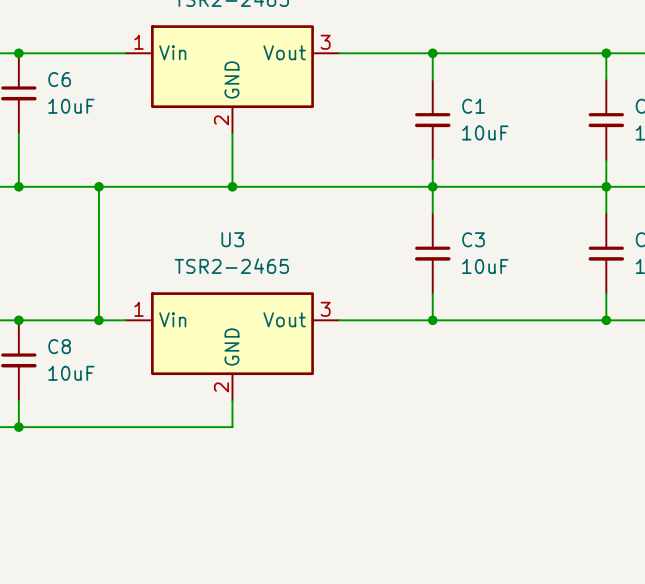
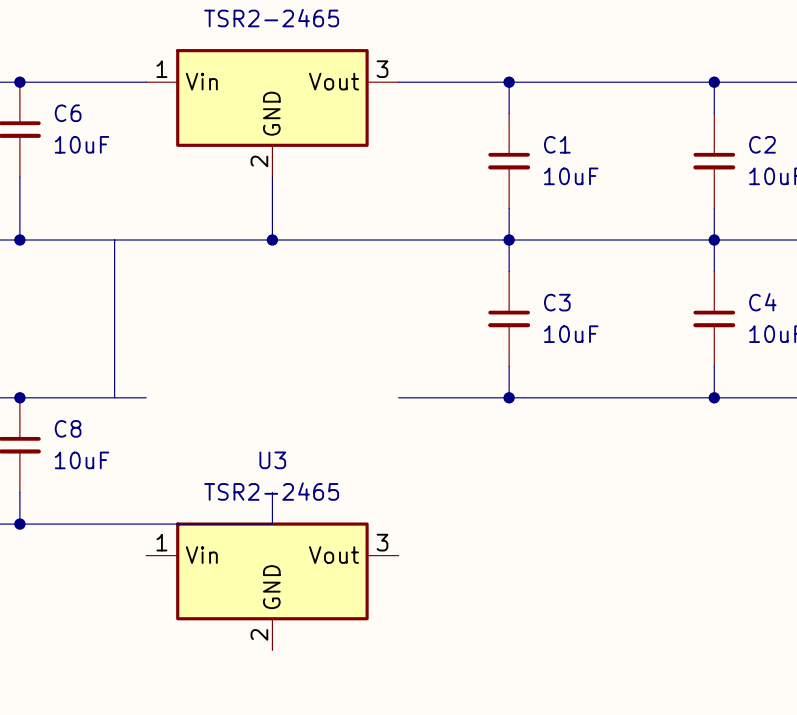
junction: (98, 186) -> none
junction: (98, 320) -> none
U3 position: (232, 346) -> (272, 586)

